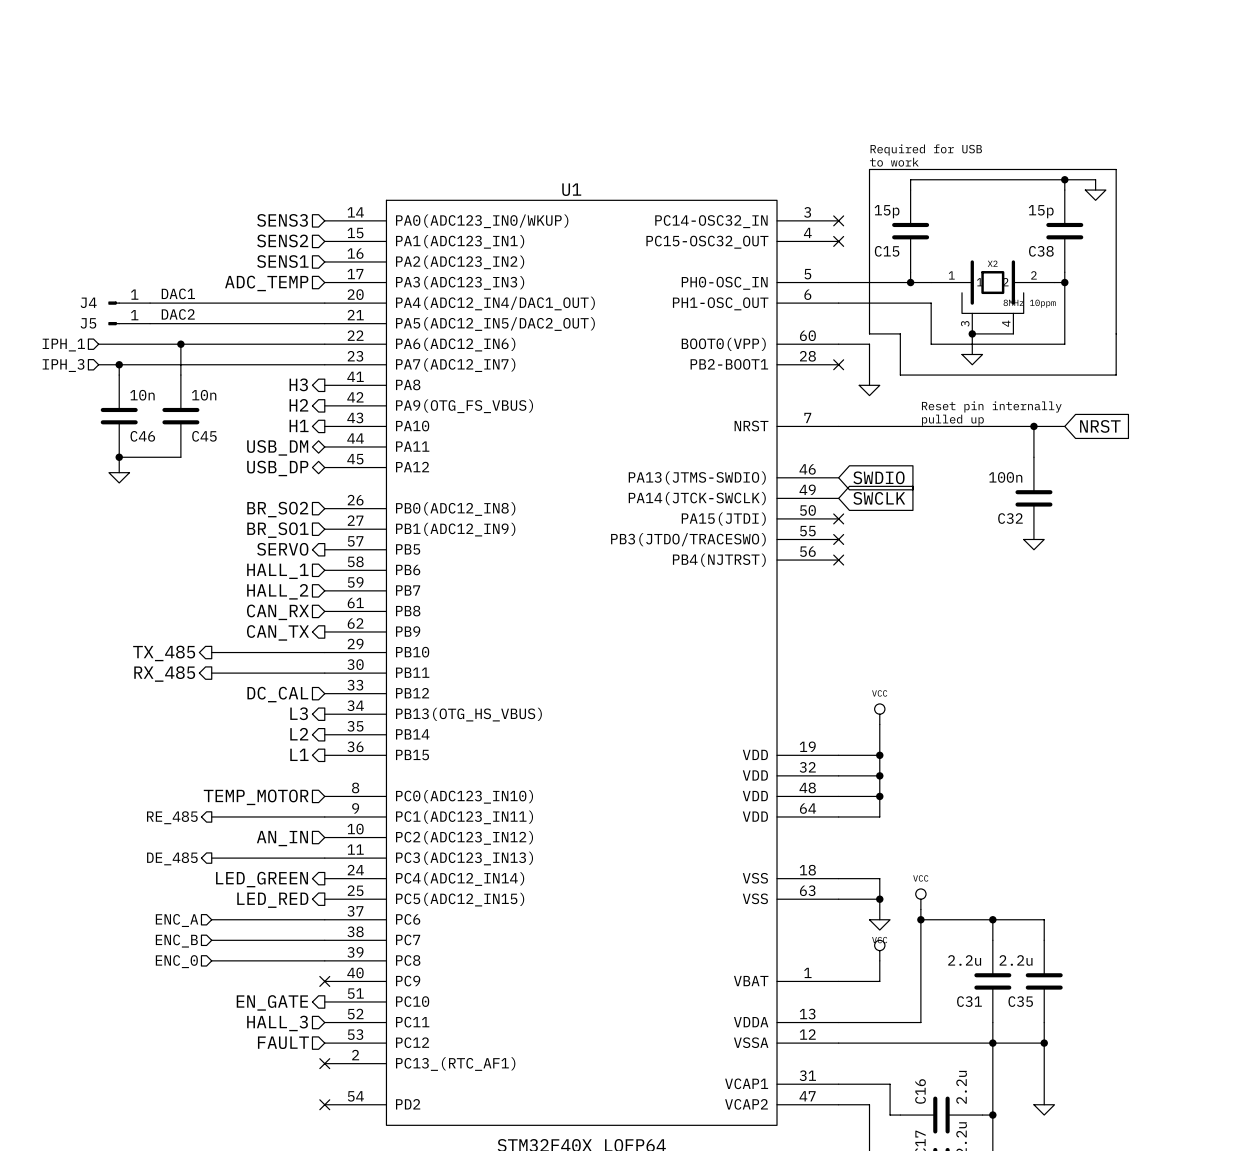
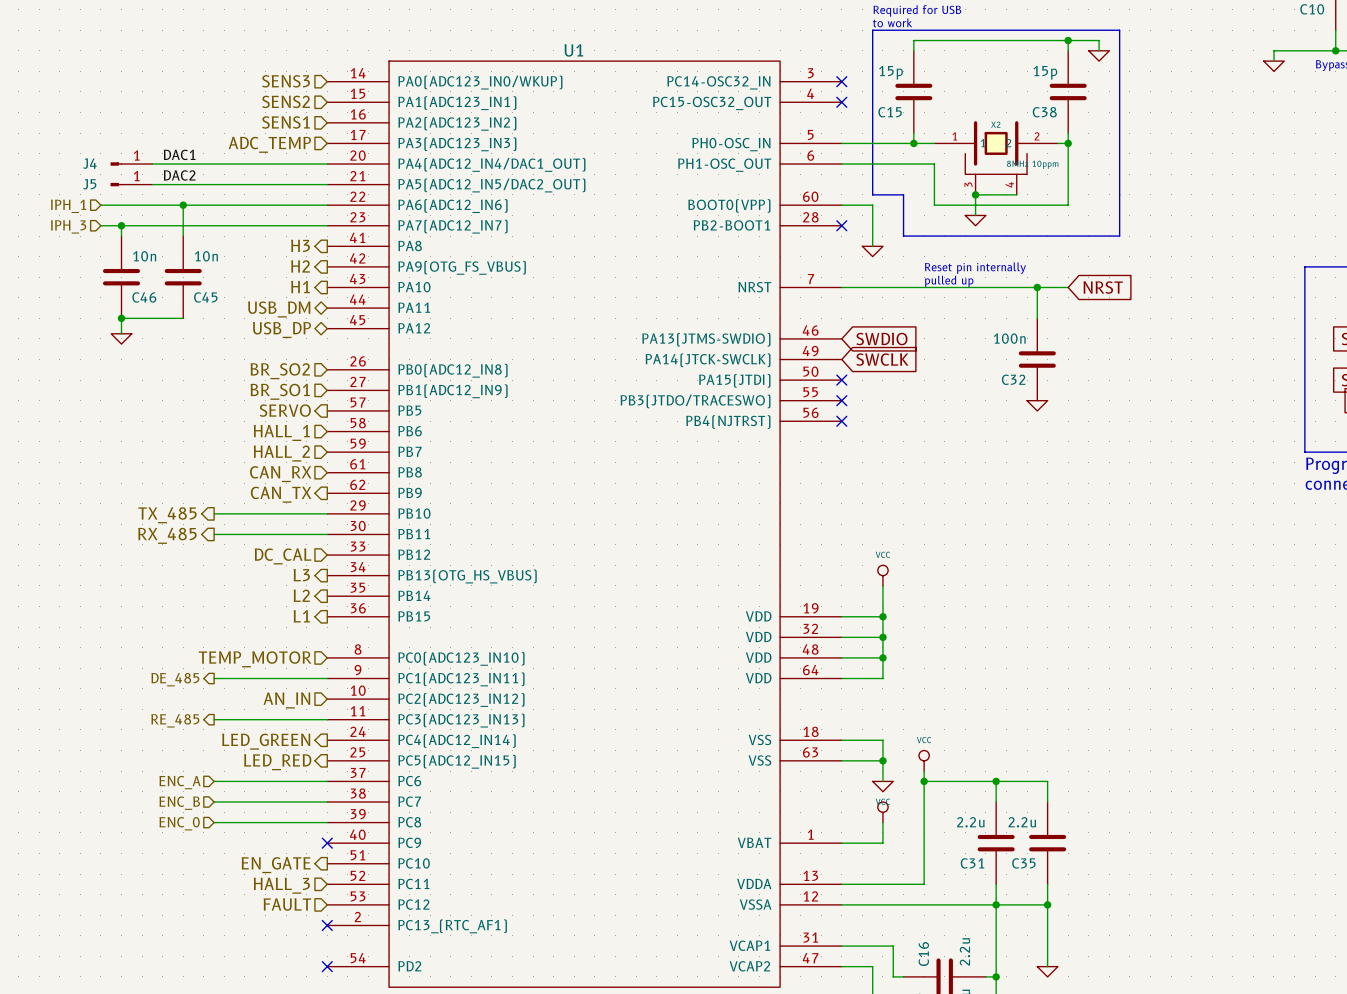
hierarchical label: RE_485 (172, 817) -> DE_485 (175, 679)
hierarchical label: DE_485 (172, 858) -> RE_485 (175, 720)

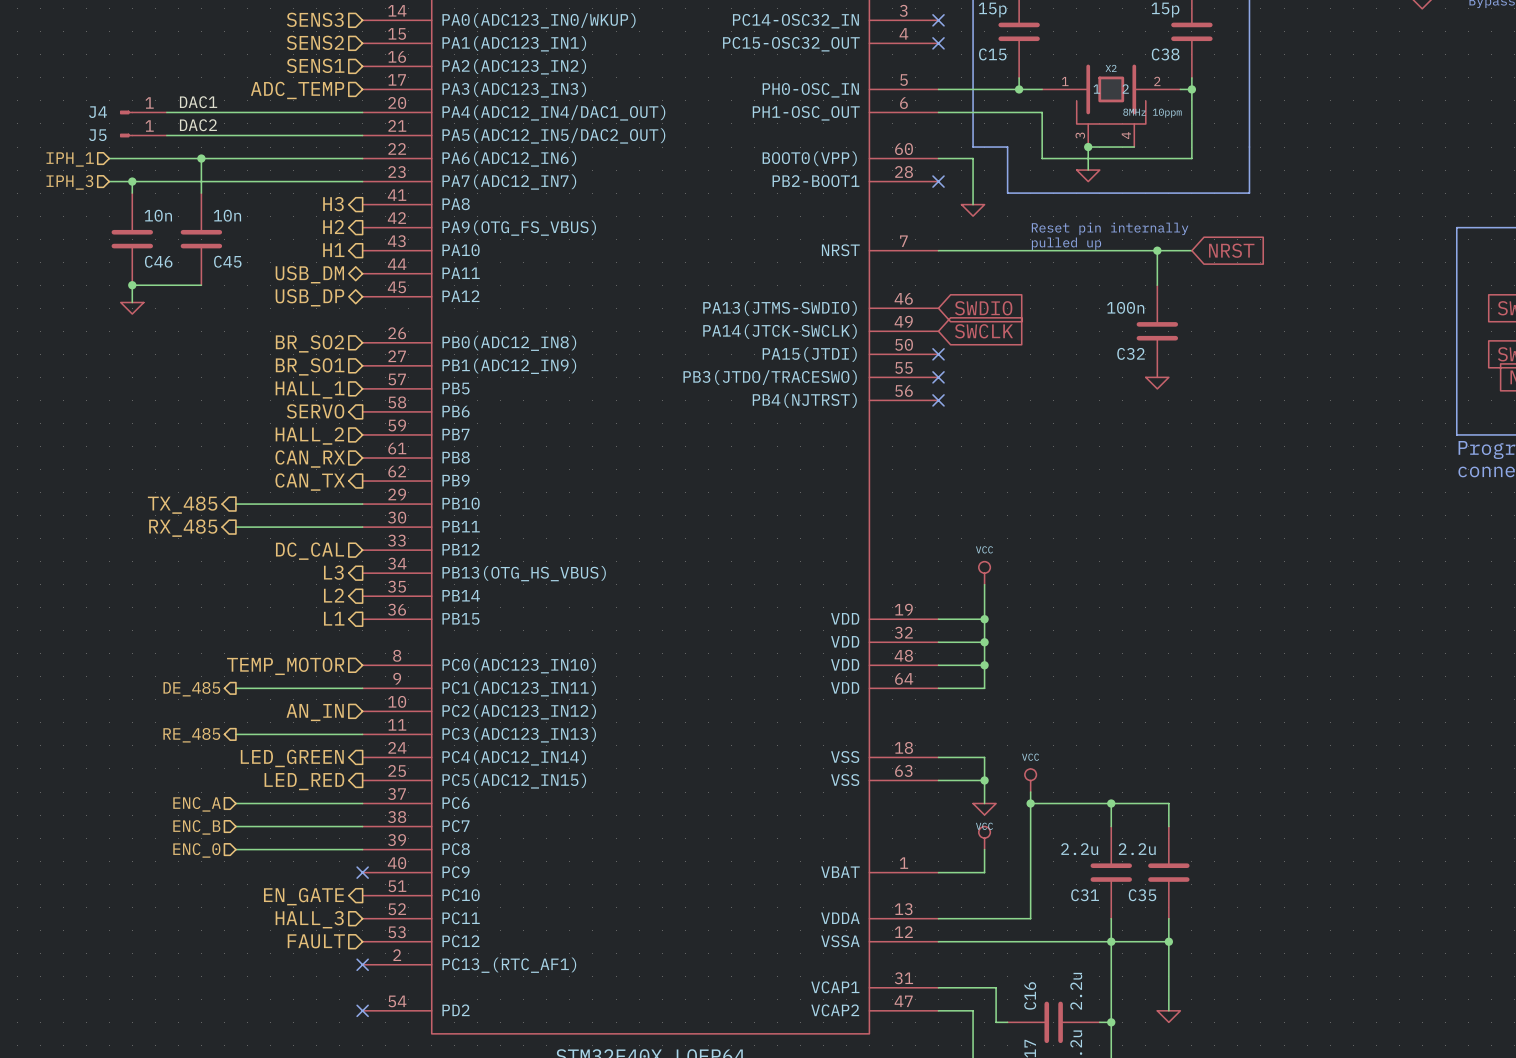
hierarchical label shape: output (285, 410) -> input (310, 390)
hierarchical label: SERVO (285, 410) -> HALL_1 (310, 390)
hierarchical label shape: input (281, 432) -> output (315, 411)
hierarchical label: HALL_1 (281, 432) -> SERVO (315, 411)

